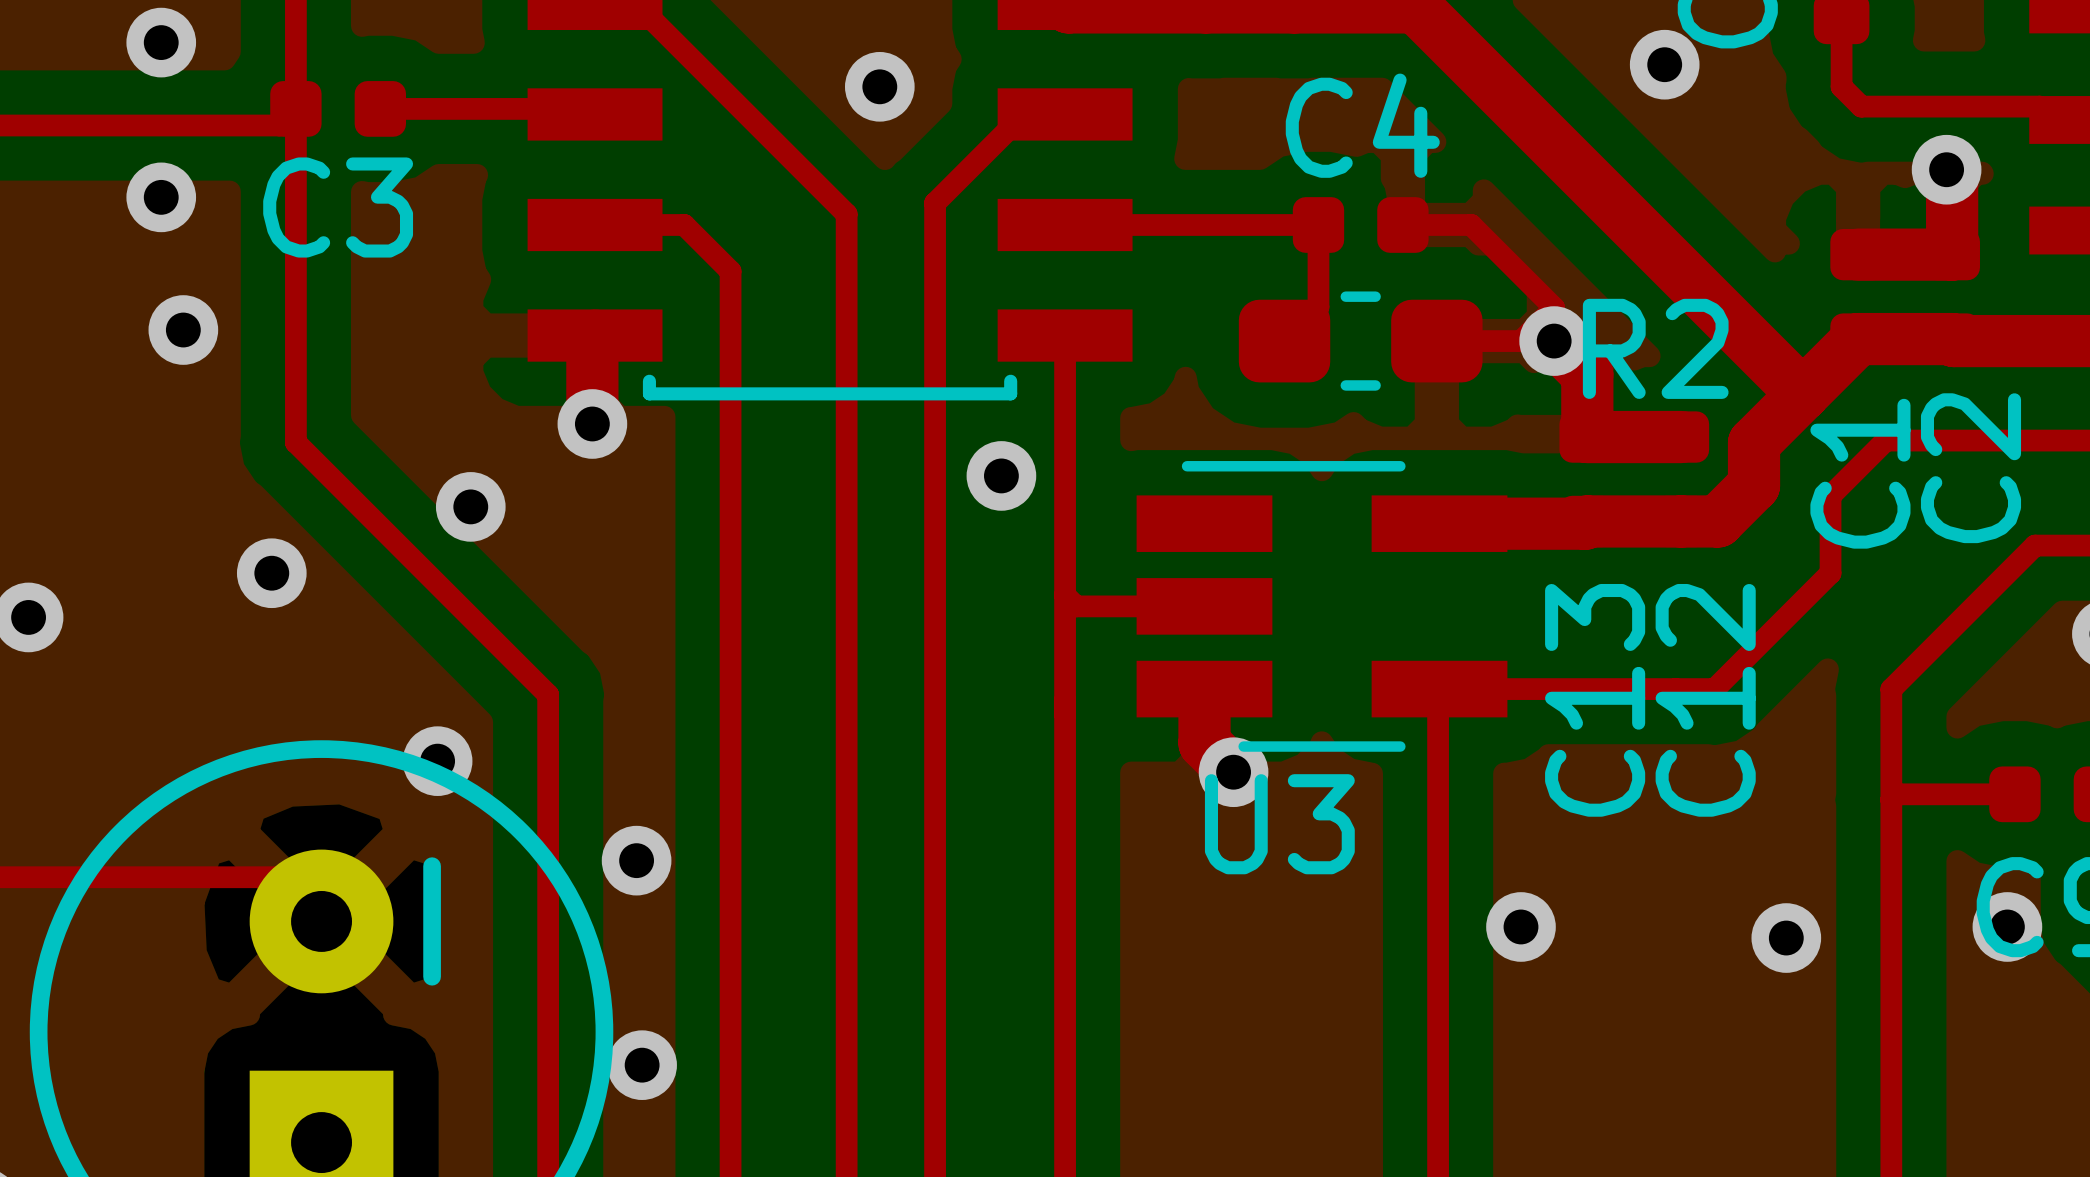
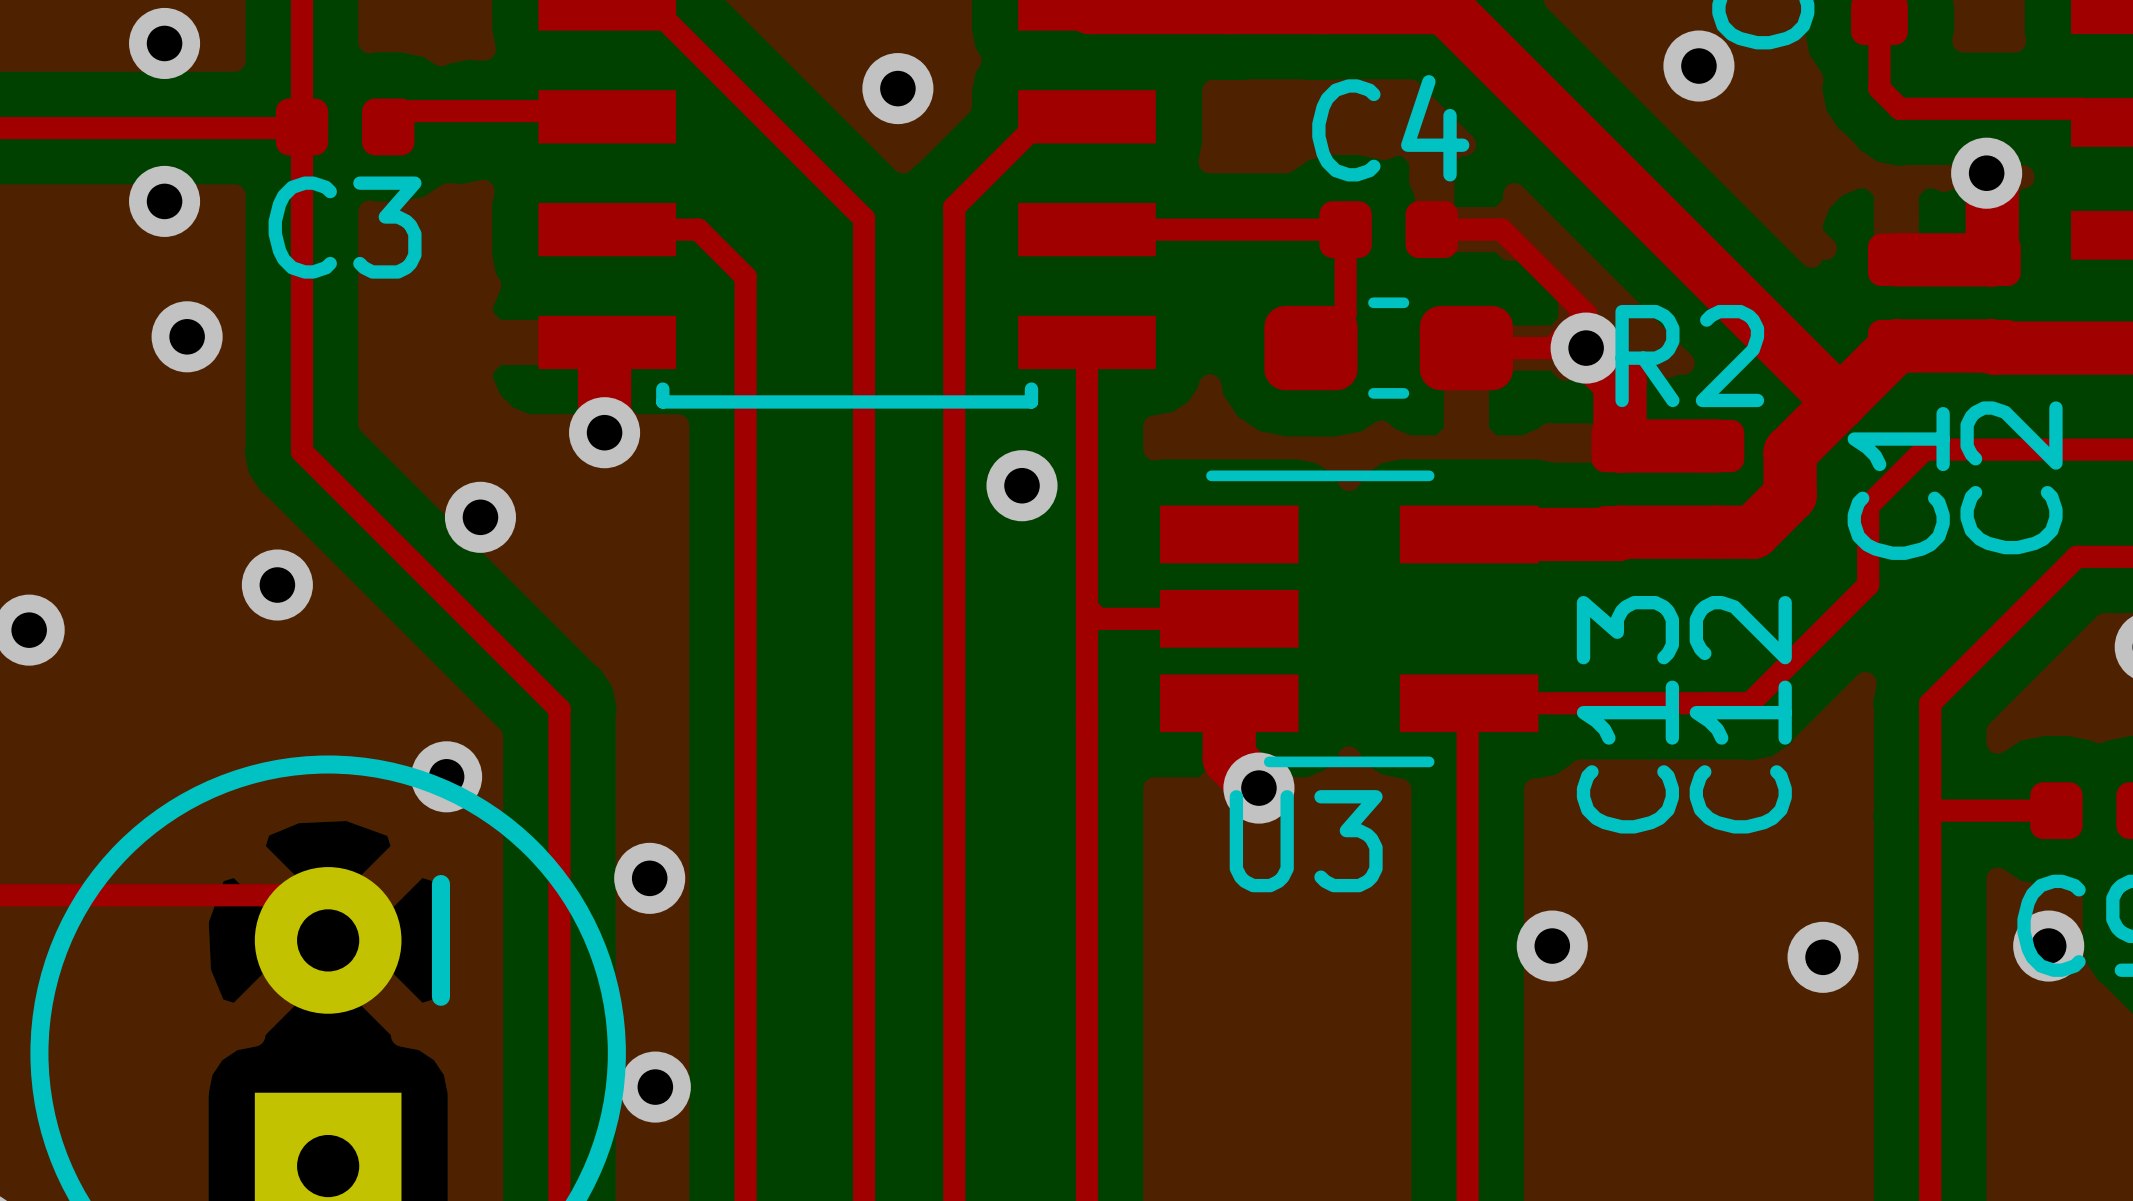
C3 position: (338, 108) -> (345, 126)

